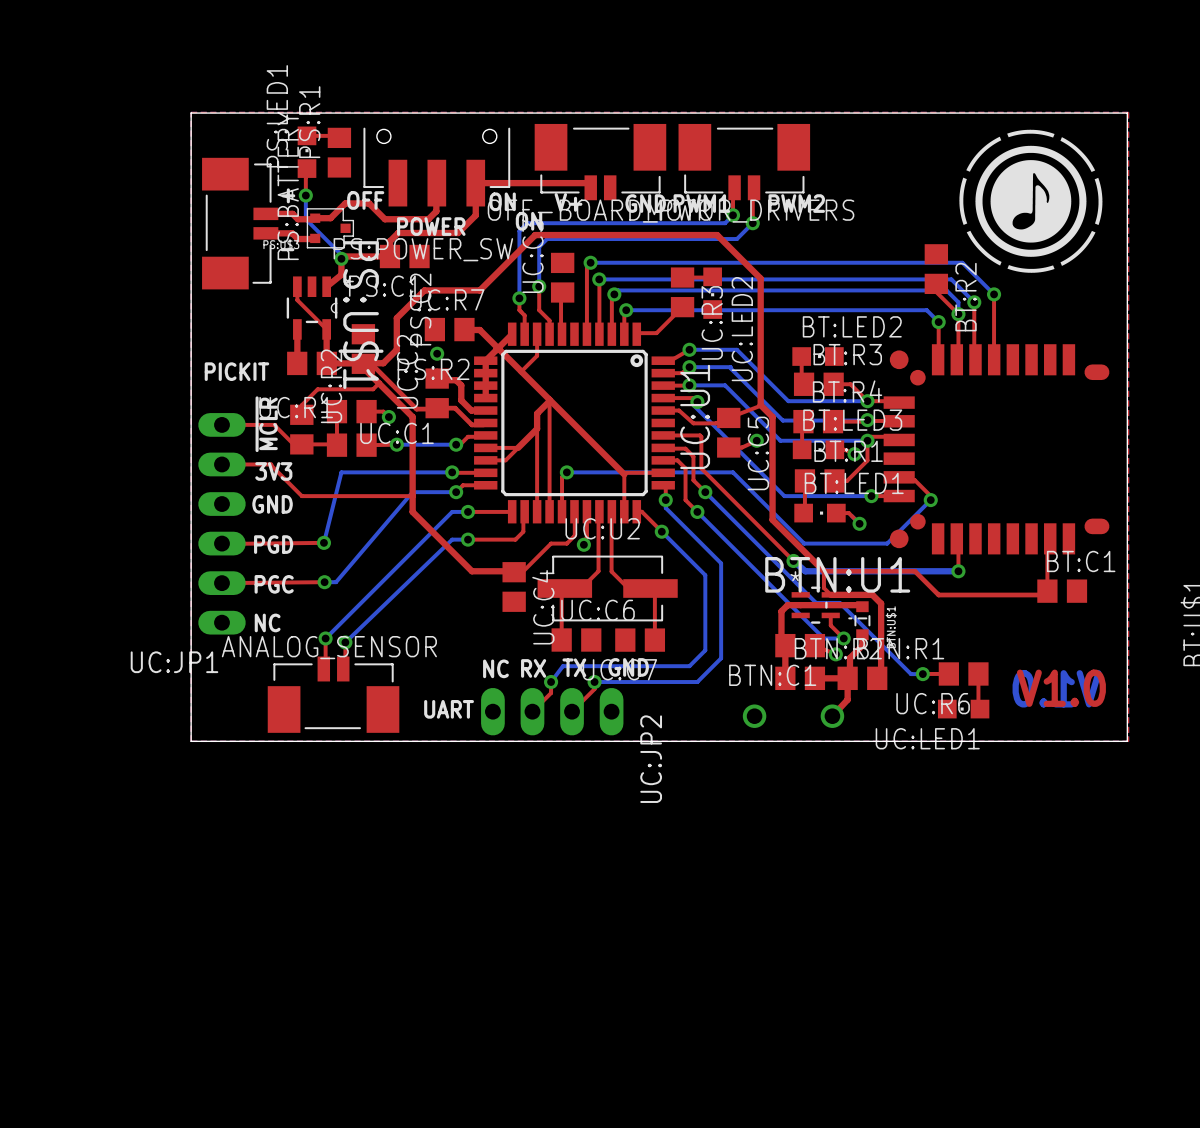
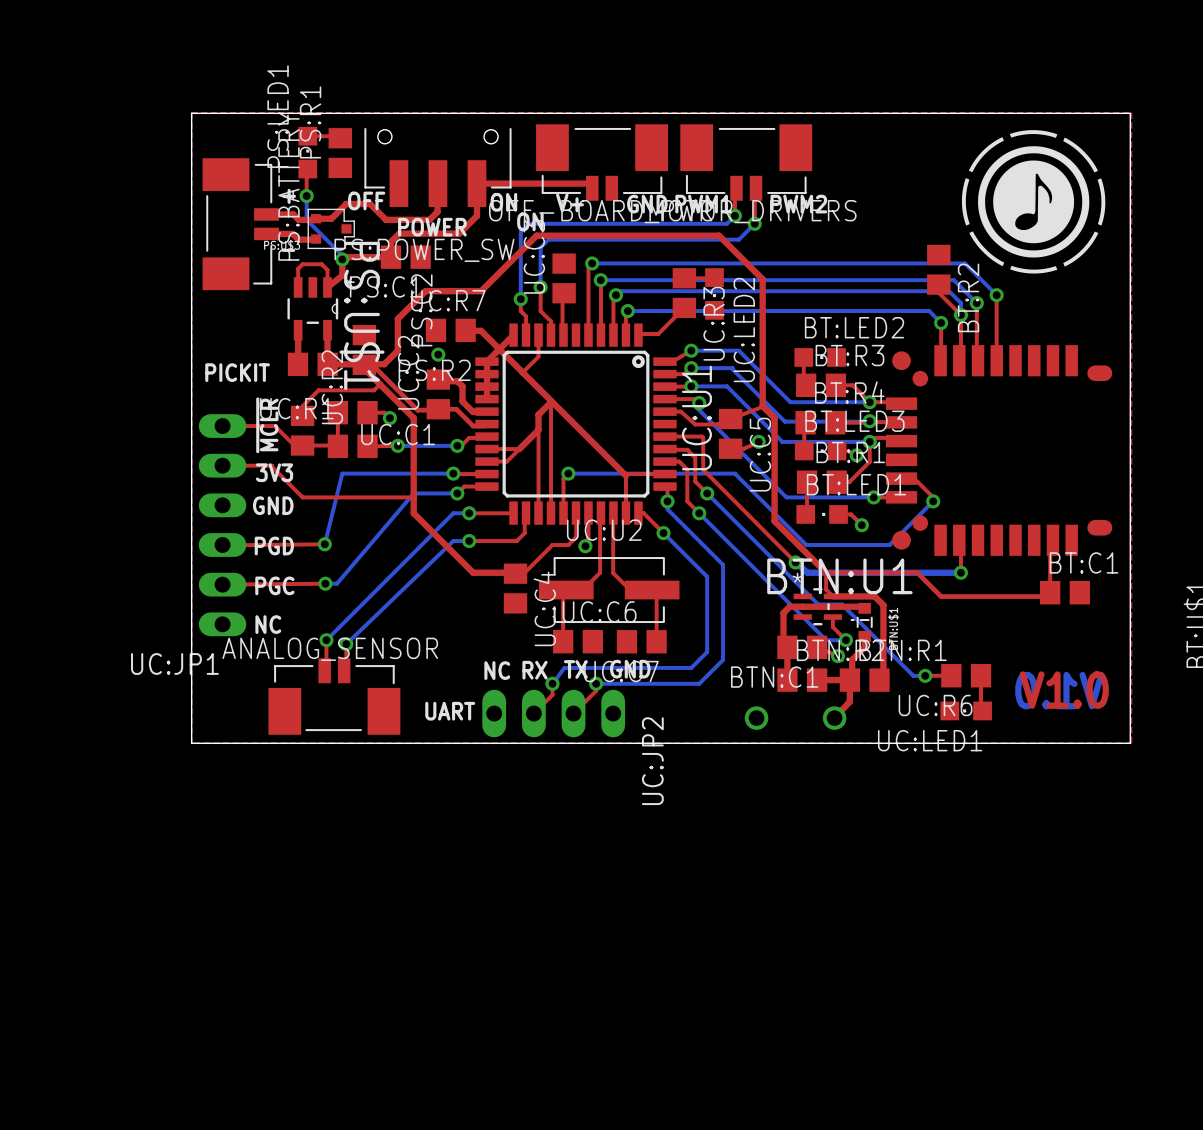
top track: (297, 286) (297, 300) (326, 329) -> (298, 287) (298, 268) (302, 264) (321, 264) (327, 270) (327, 287)

